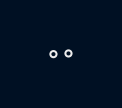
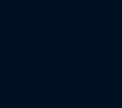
via: (68, 53) -> none
via: (53, 54) -> none

